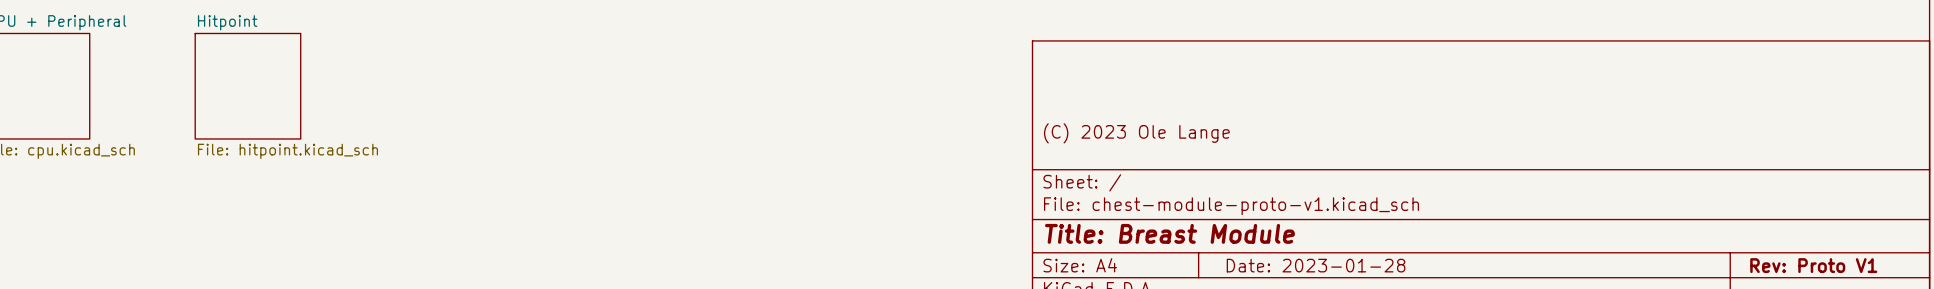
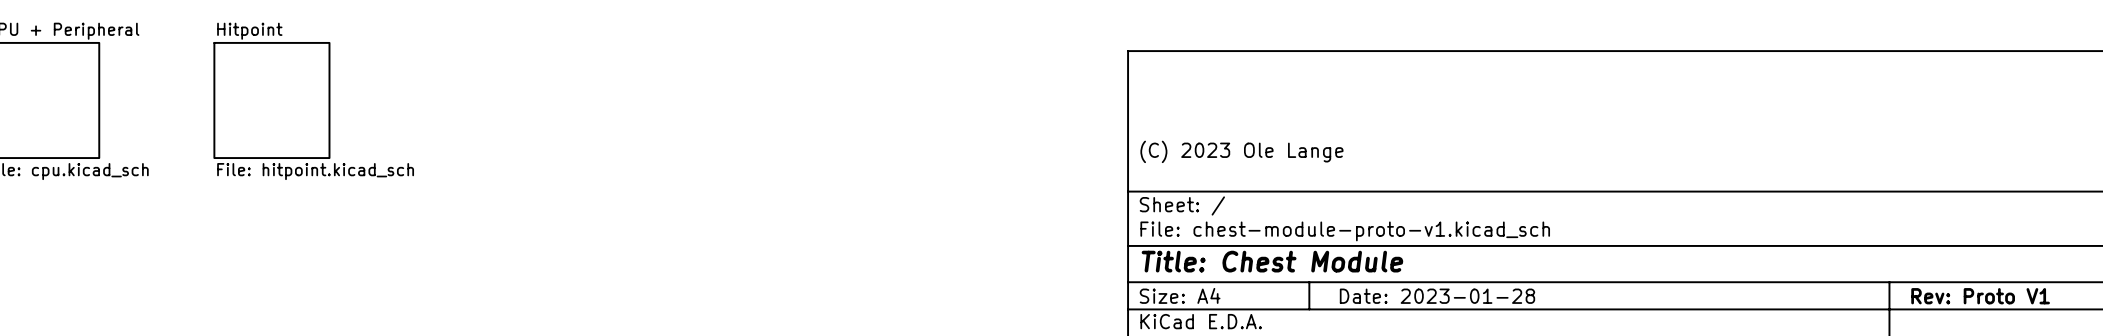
title block: Title: Breast Module (1169, 233) -> Title: Chest Module (1272, 261)

